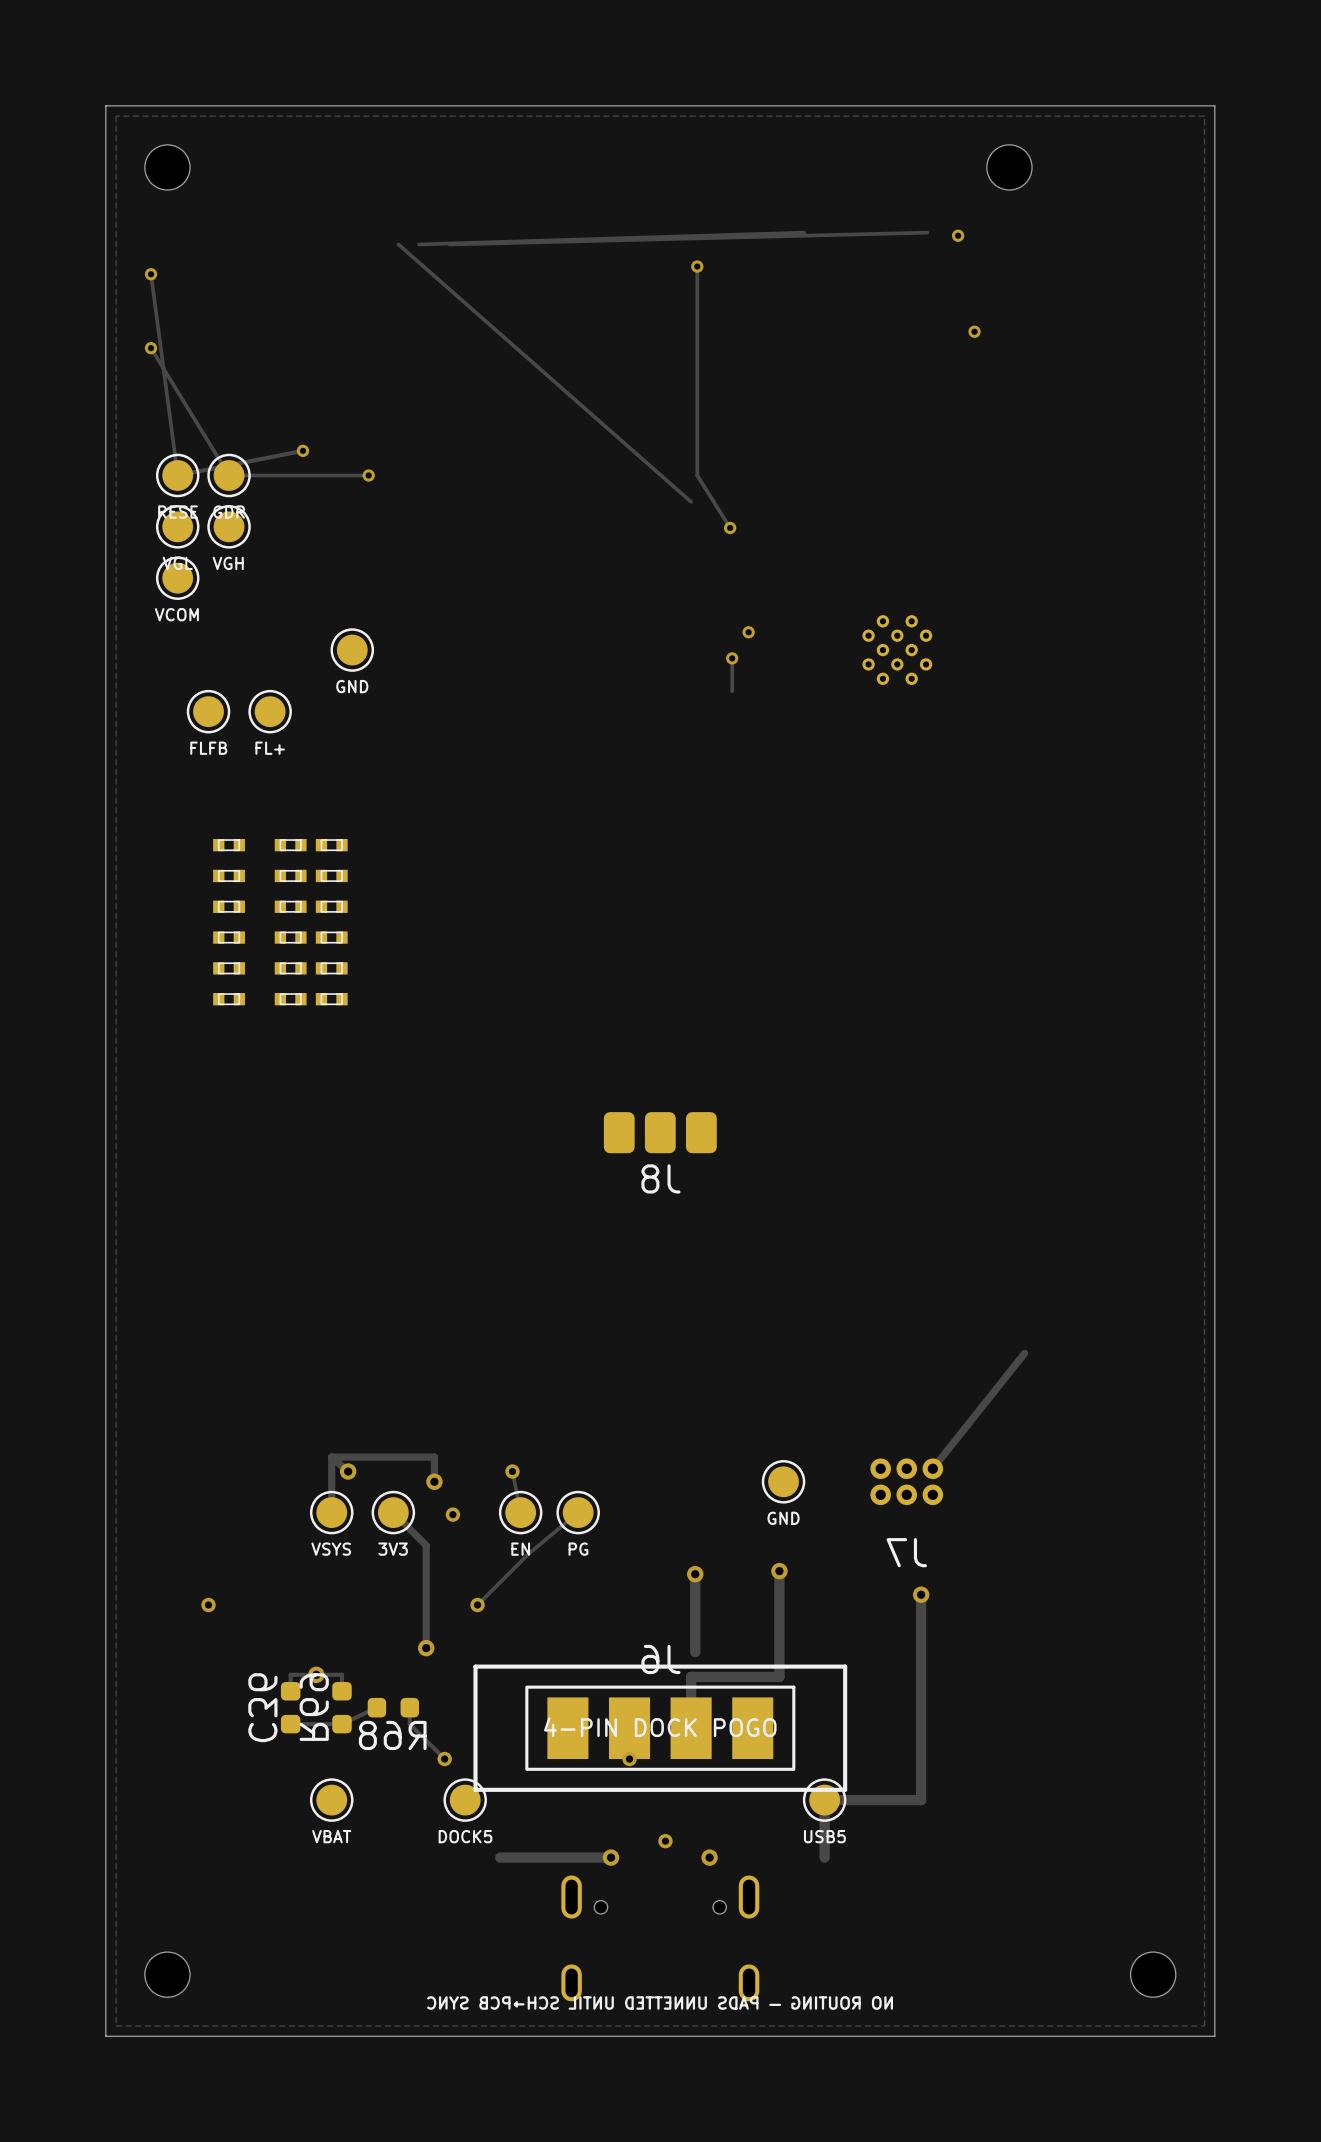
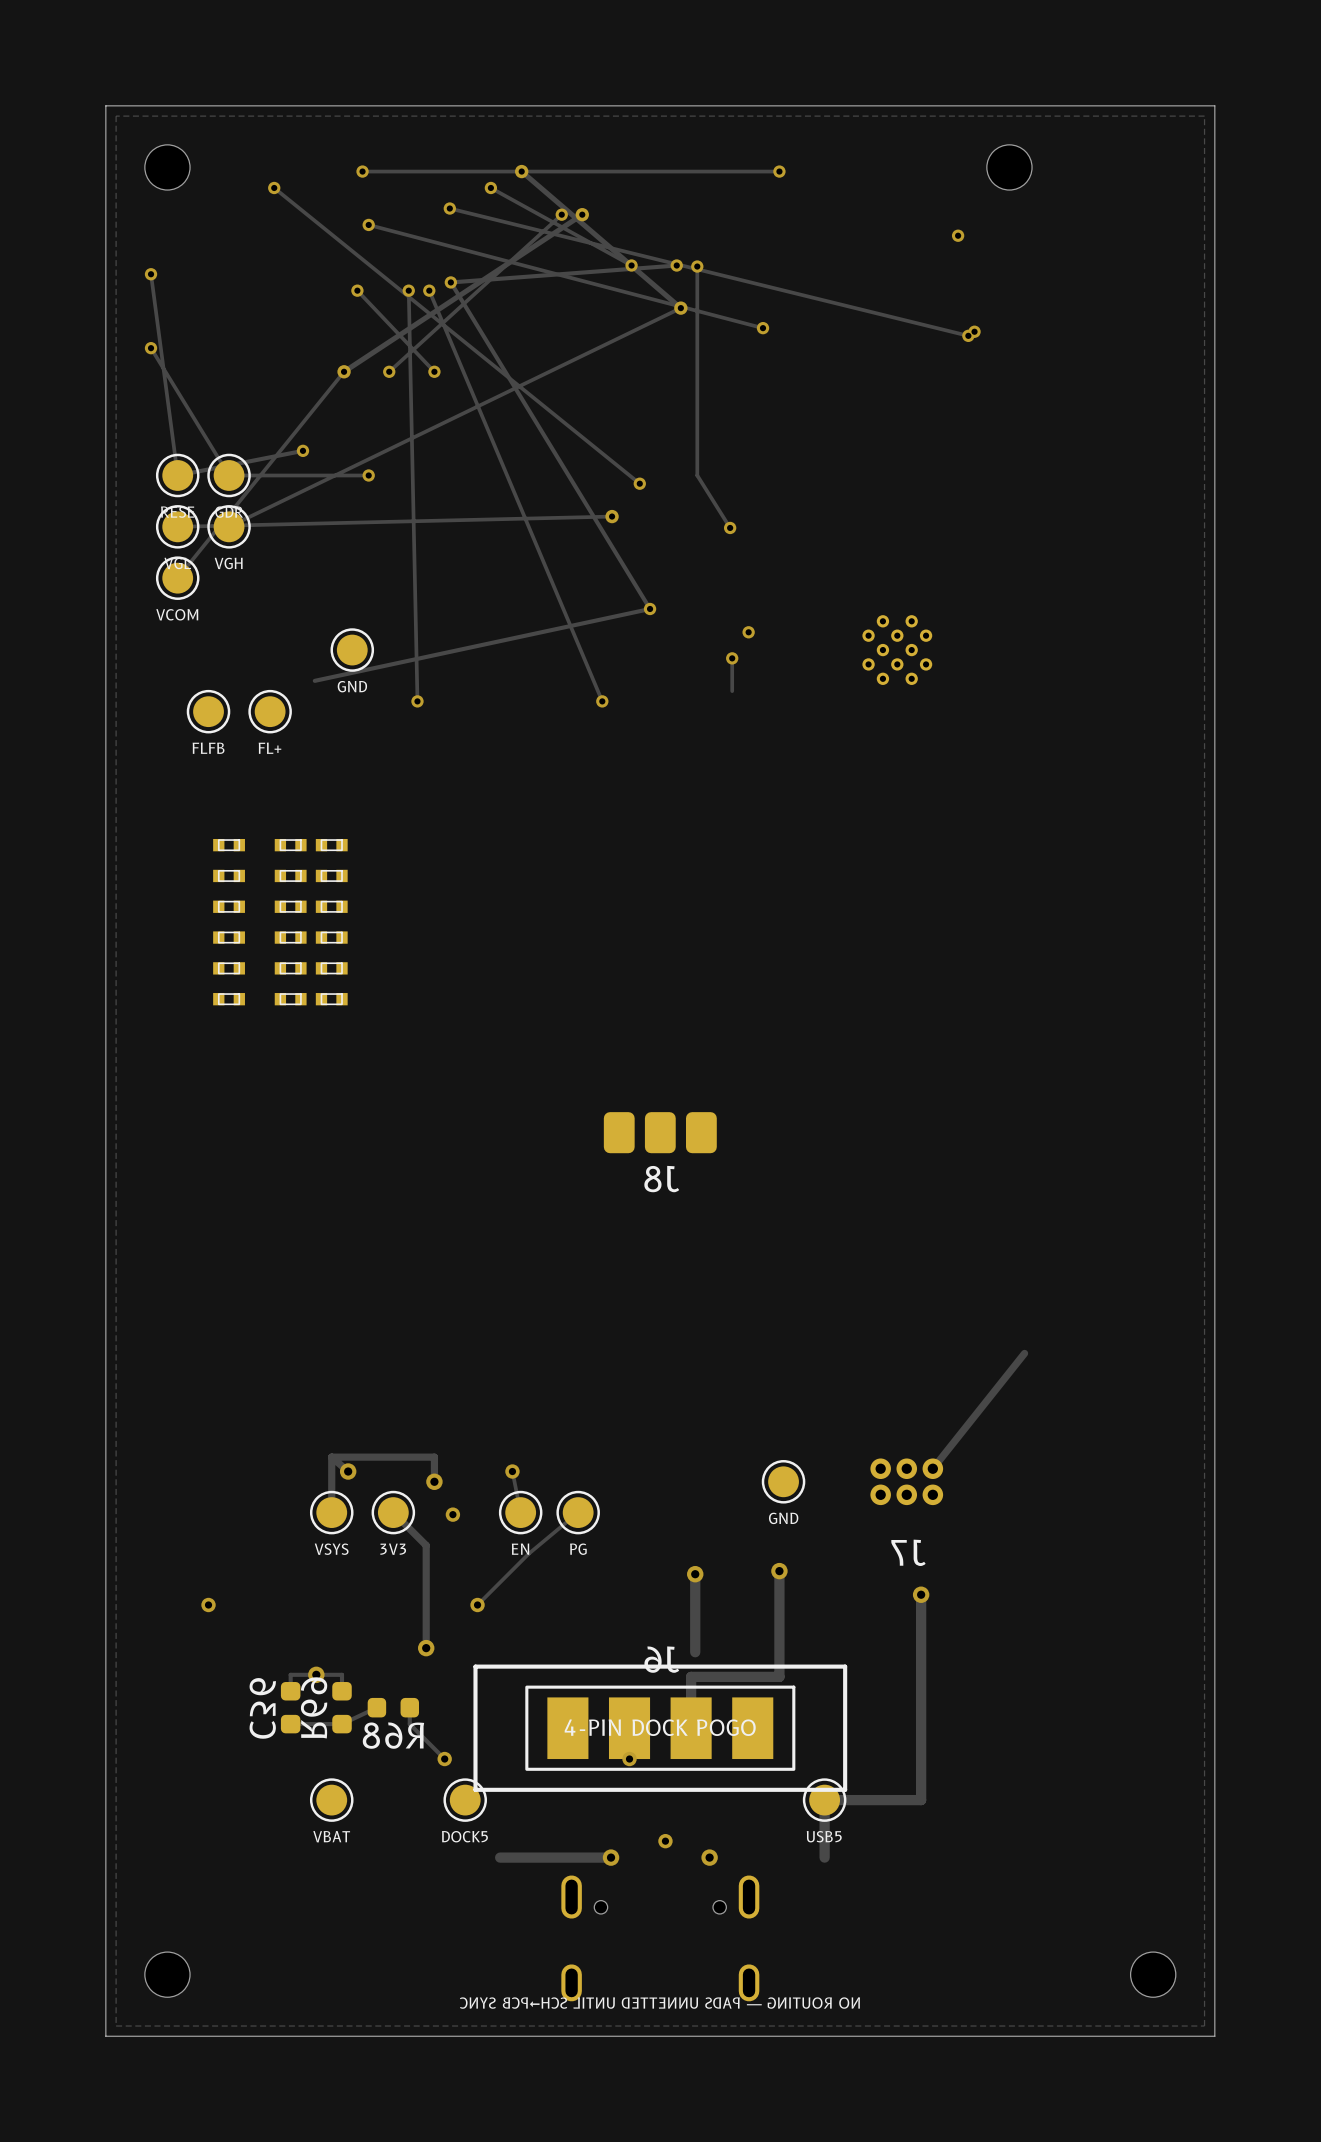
via: none -> (362, 171)
track: none -> (521, 171) (680, 308) (229, 526)
via: none -> (521, 171)
track: none -> (779, 171) (362, 171)
via: none -> (779, 171)
track: none -> (274, 187) (639, 483)
via: none -> (274, 187)
track: none -> (490, 187) (631, 265)
via: none -> (490, 187)
track: none -> (449, 208) (968, 335)
via: none -> (449, 208)
track: none -> (561, 214) (389, 371)
via: none -> (561, 214)
track: none -> (582, 214) (344, 371) (177, 578)
via: none -> (582, 214)
track: none -> (368, 224) (763, 328)
via: none -> (368, 224)
track: (804, 232) (419, 244) -> none
track: (927, 232) (449, 244) -> none
track: (398, 244) (691, 501) -> none
via: none -> (631, 265)
track: none -> (676, 265) (450, 282) (650, 608) (314, 680)
via: none -> (676, 265)
via: none -> (450, 282)
track: none -> (357, 290) (434, 371)
via: none -> (357, 290)
track: none -> (408, 290) (417, 701)
via: none -> (408, 290)
track: none -> (429, 290) (602, 701)
via: none -> (429, 290)
via: none -> (680, 308)
via: none -> (763, 328)
via: none -> (968, 335)
via: none -> (344, 371)
via: none -> (389, 371)
via: none -> (434, 371)
via: none -> (639, 483)
track: none -> (612, 516) (177, 526)
via: none -> (612, 516)
via: none -> (650, 608)
via: none -> (417, 701)
via: none -> (602, 701)

